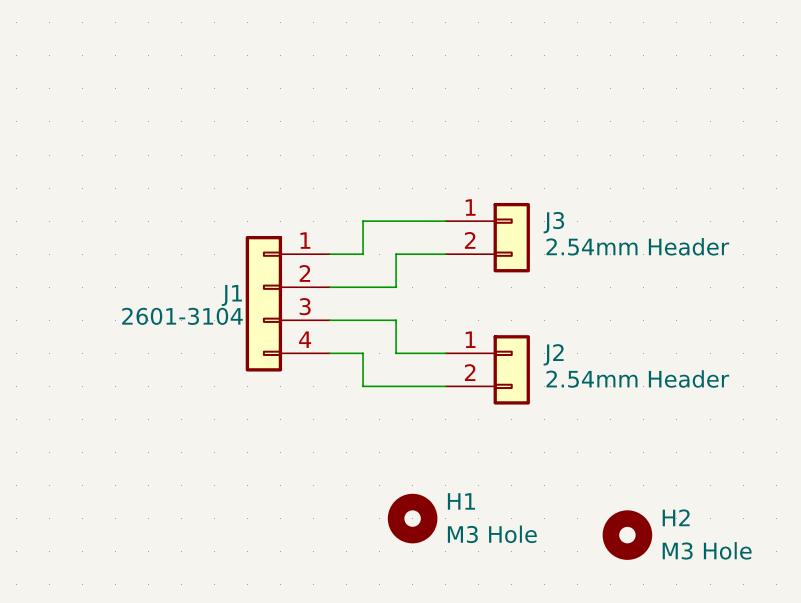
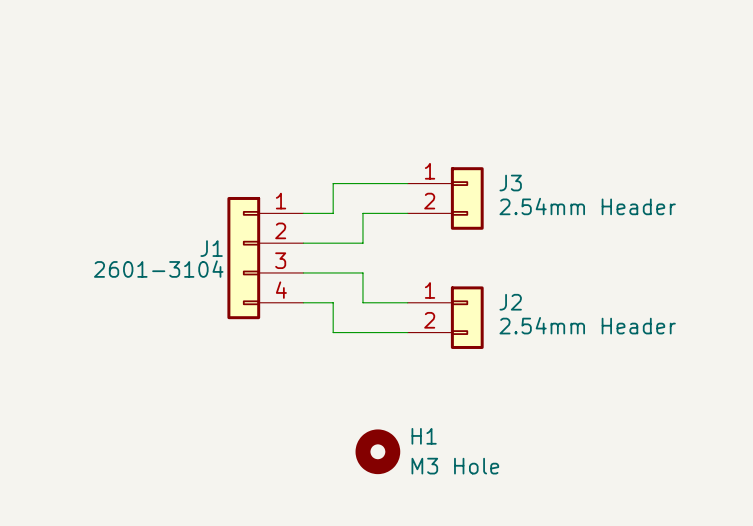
H2: M3 Hole (627, 535) -> none

